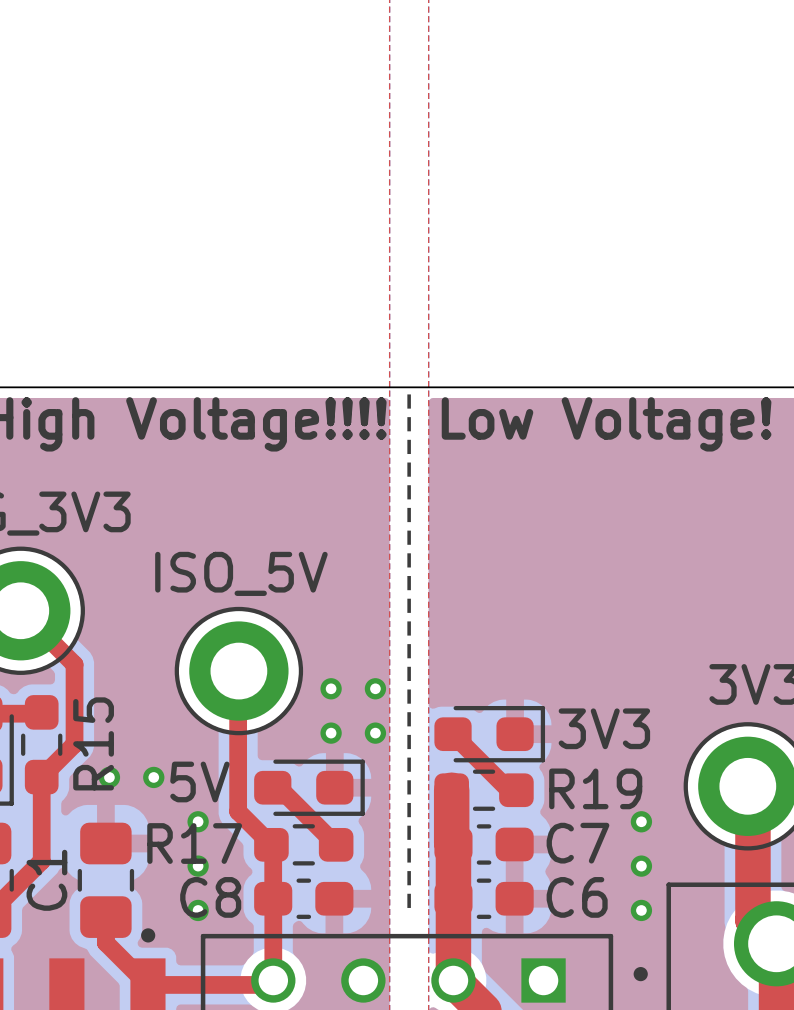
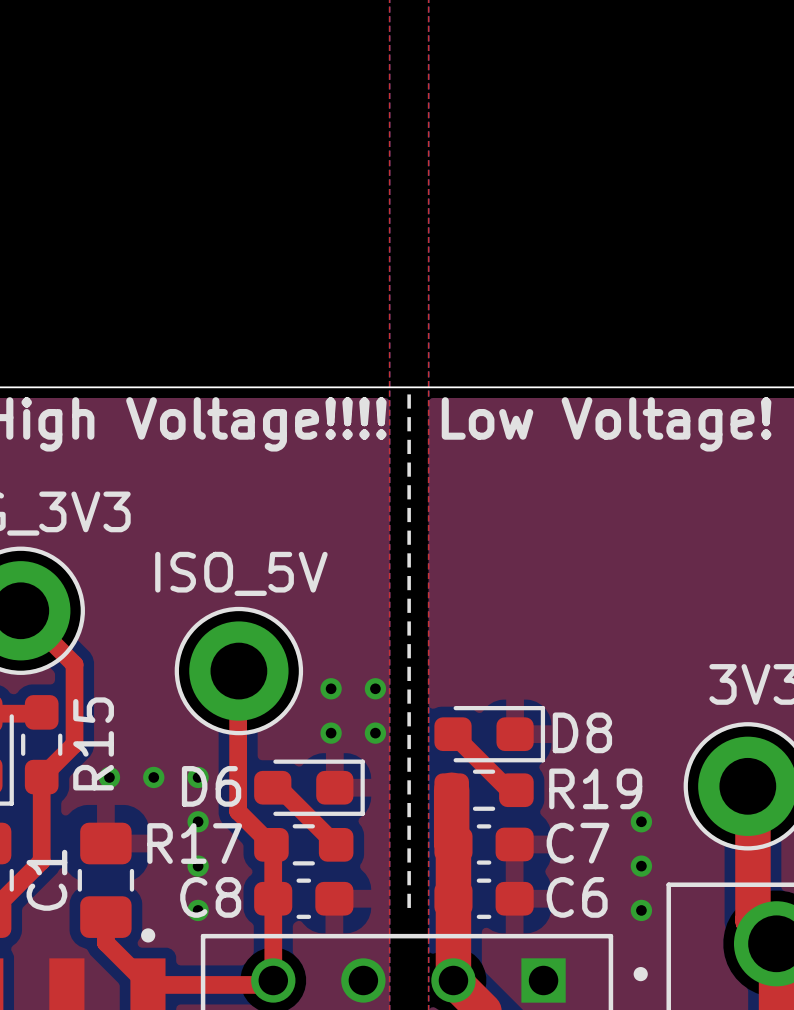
text: 3V3 (604, 728) -> none
D8 name: none -> D8 (582, 732)
via: none -> (198, 777)
text: 5V (199, 781) -> none
D6 name: none -> D6 (211, 786)

